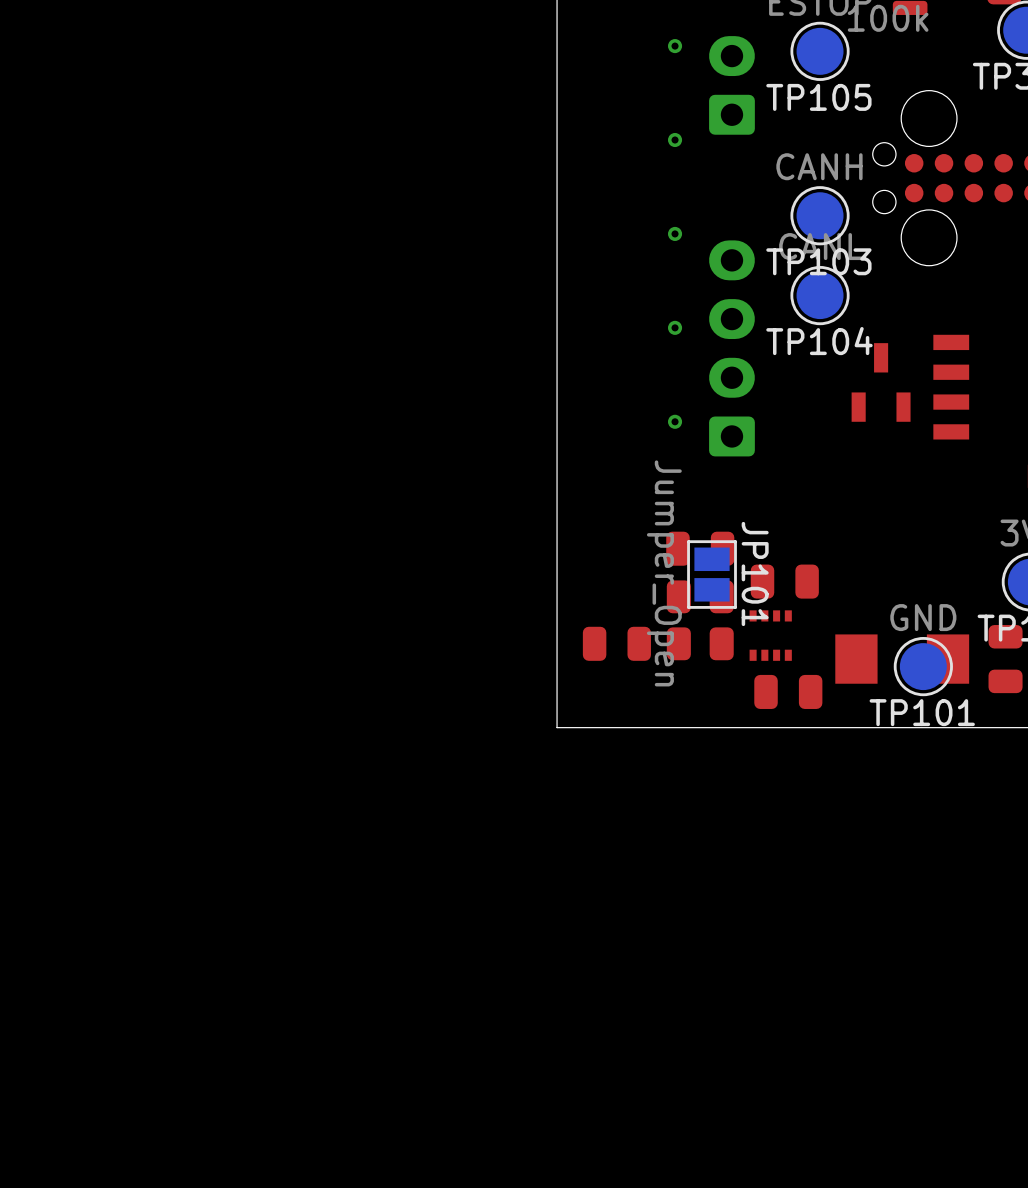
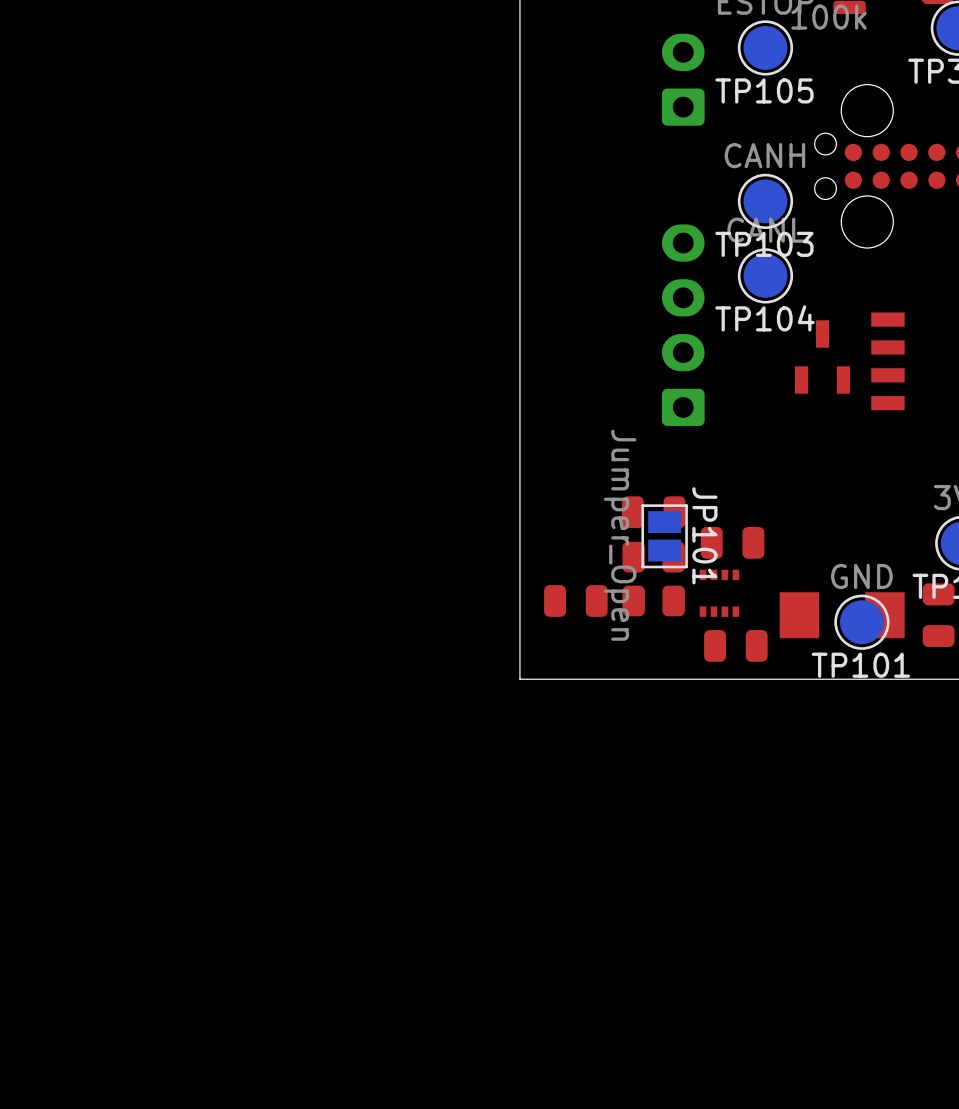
via: (675, 46) -> none
via: (675, 140) -> none
via: (675, 233) -> none
via: (675, 327) -> none
via: (675, 421) -> none

